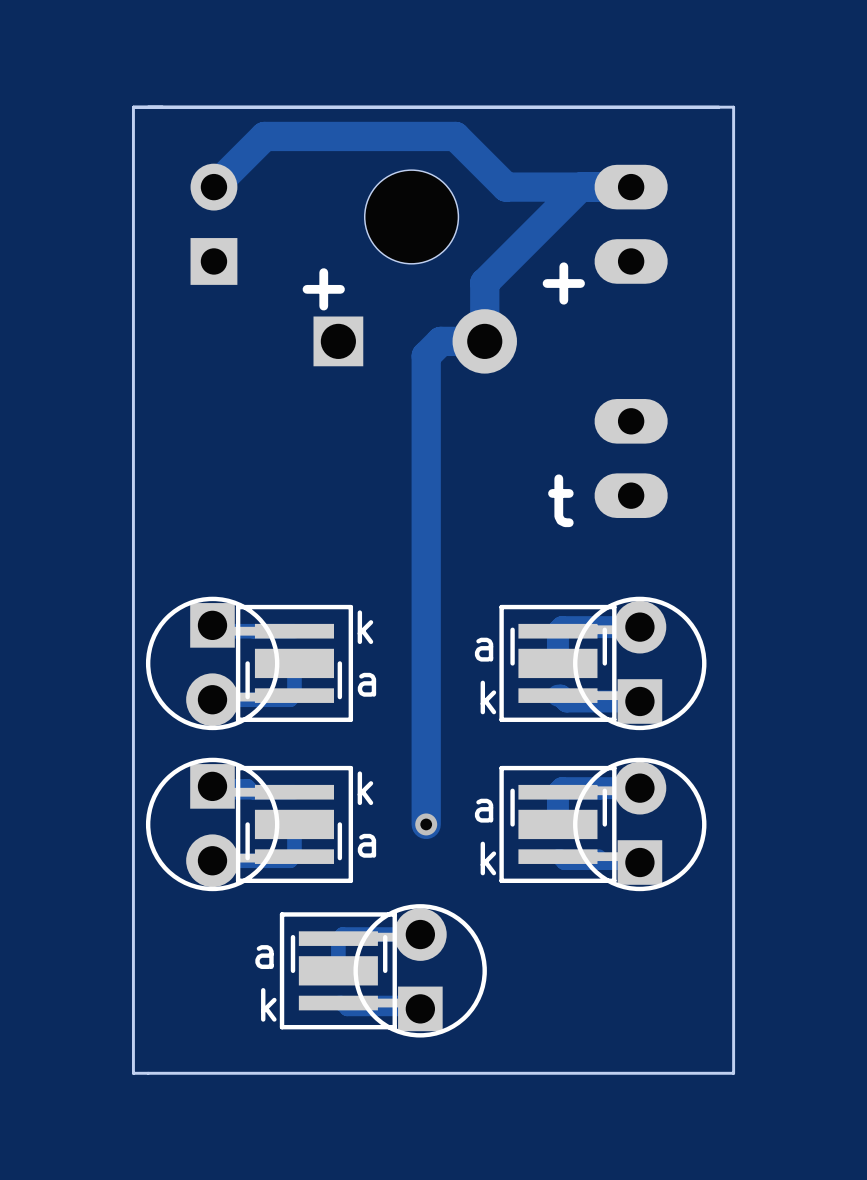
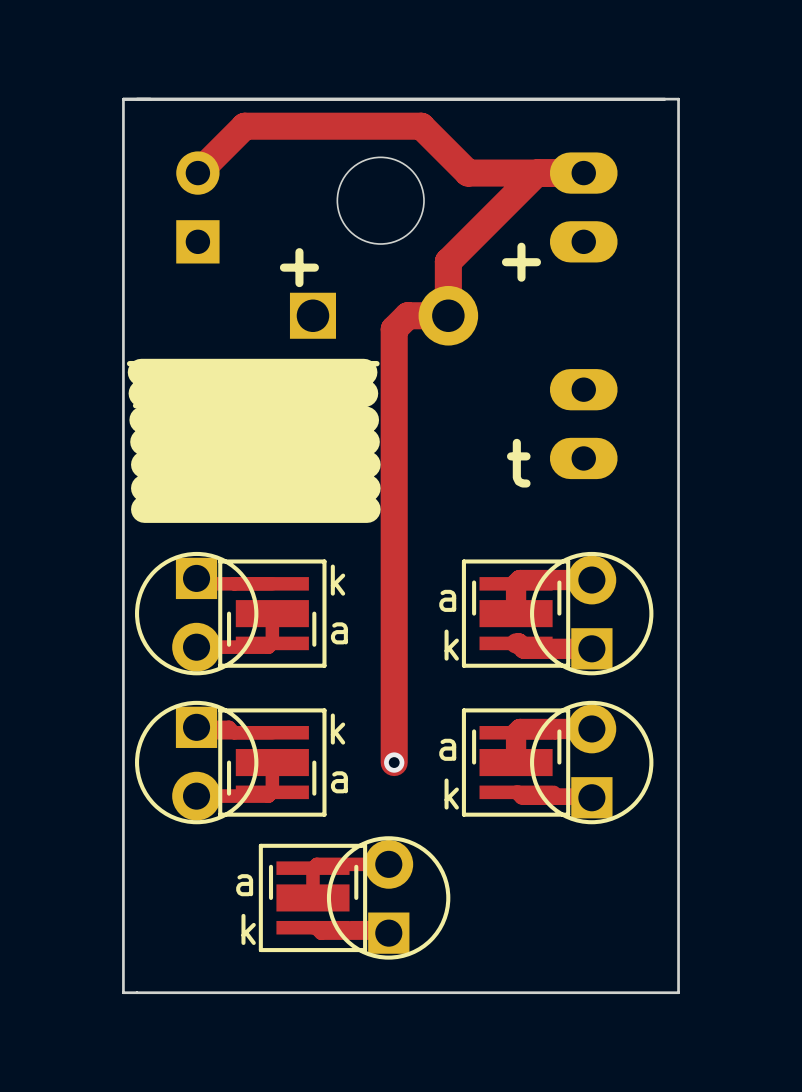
line: none -> (129, 363) (376, 363)
line: none -> (141, 372) (363, 372)
line: none -> (142, 393) (364, 393)
line: none -> (135, 405) (145, 405)
line: none -> (142, 420) (365, 420)
line: none -> (143, 441) (366, 441)
line: none -> (144, 464) (367, 464)
line: none -> (144, 488) (367, 488)
line: none -> (144, 509) (367, 509)

